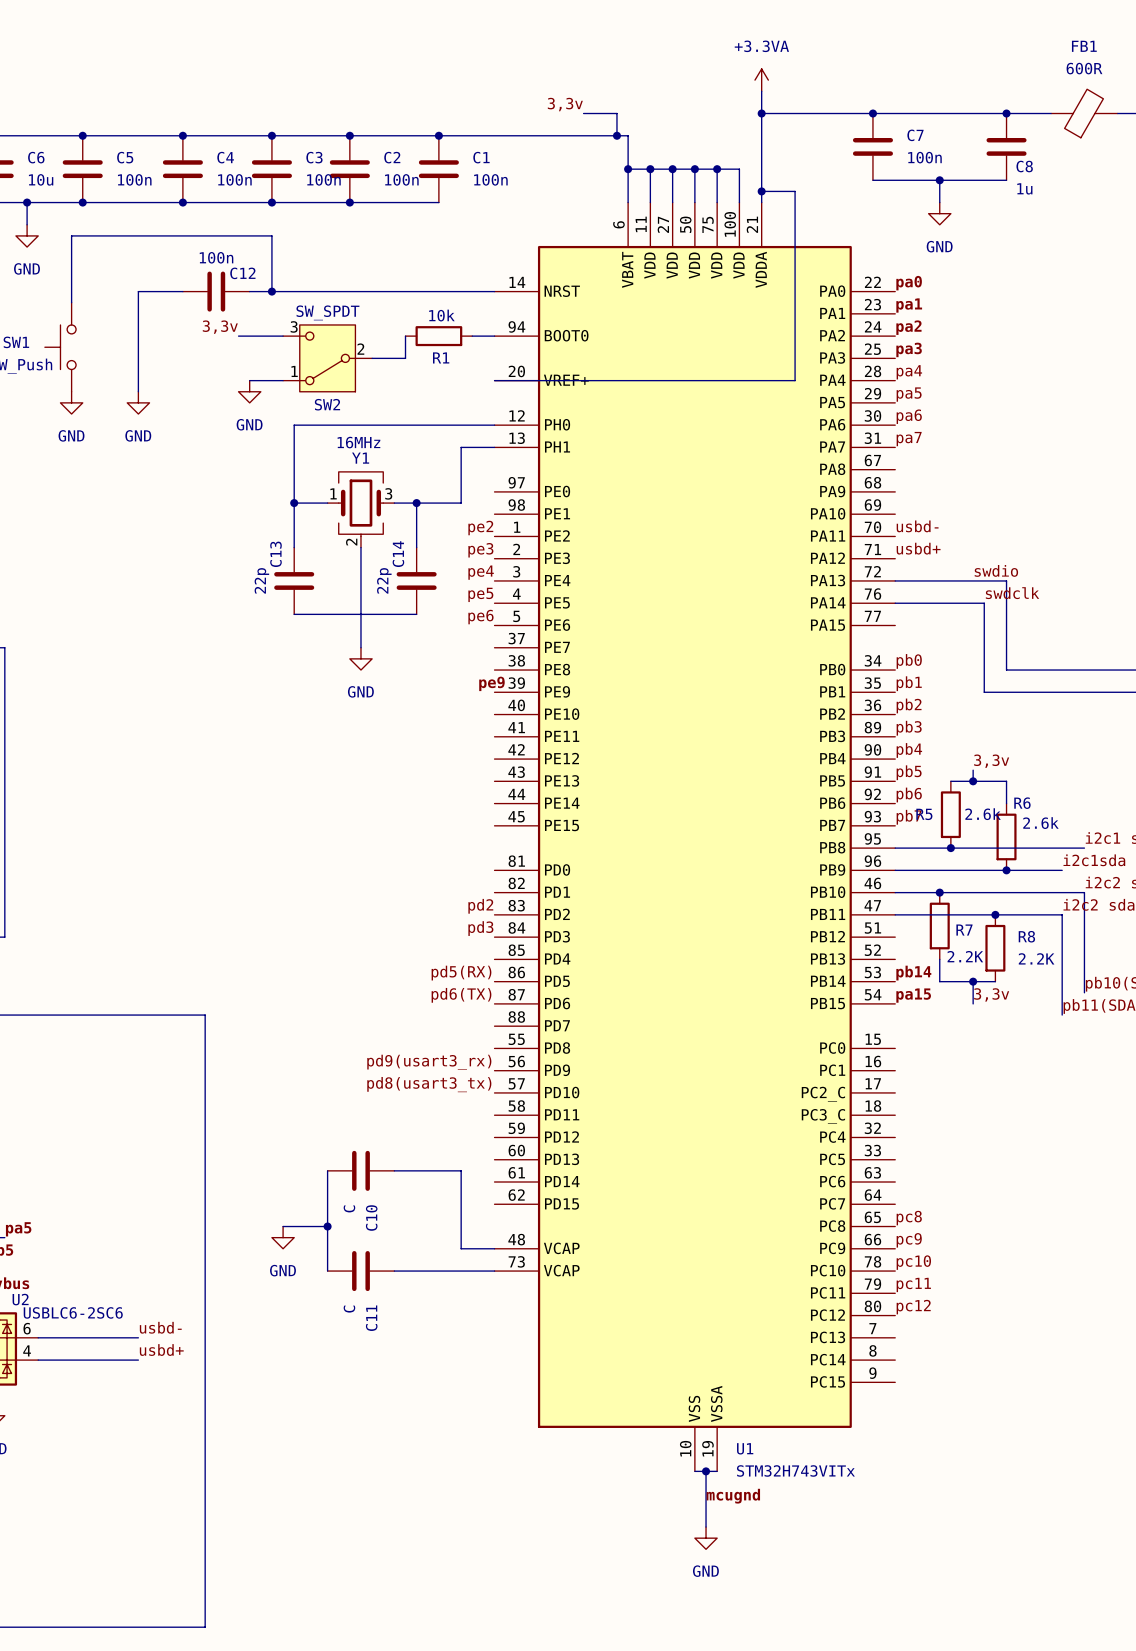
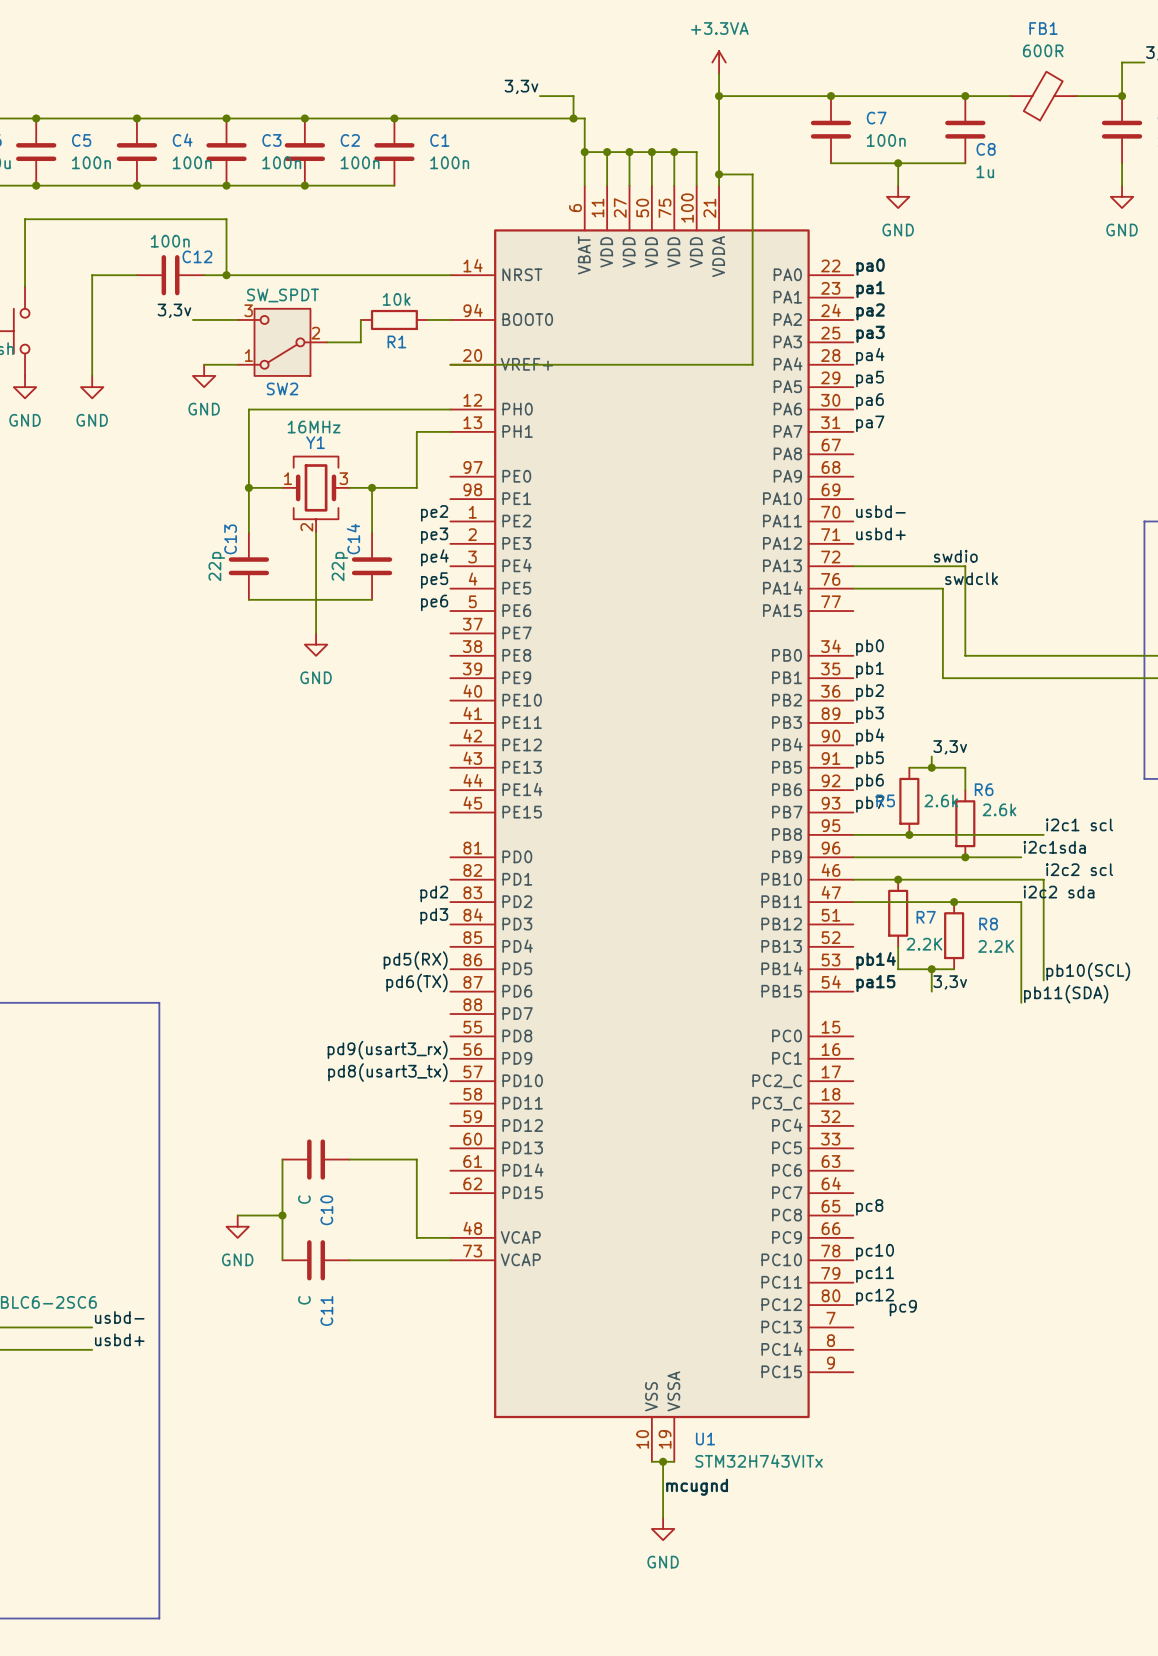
label: pe9 (491, 683) -> none
label position: pc9 (909, 1240) -> pc9 (903, 1308)

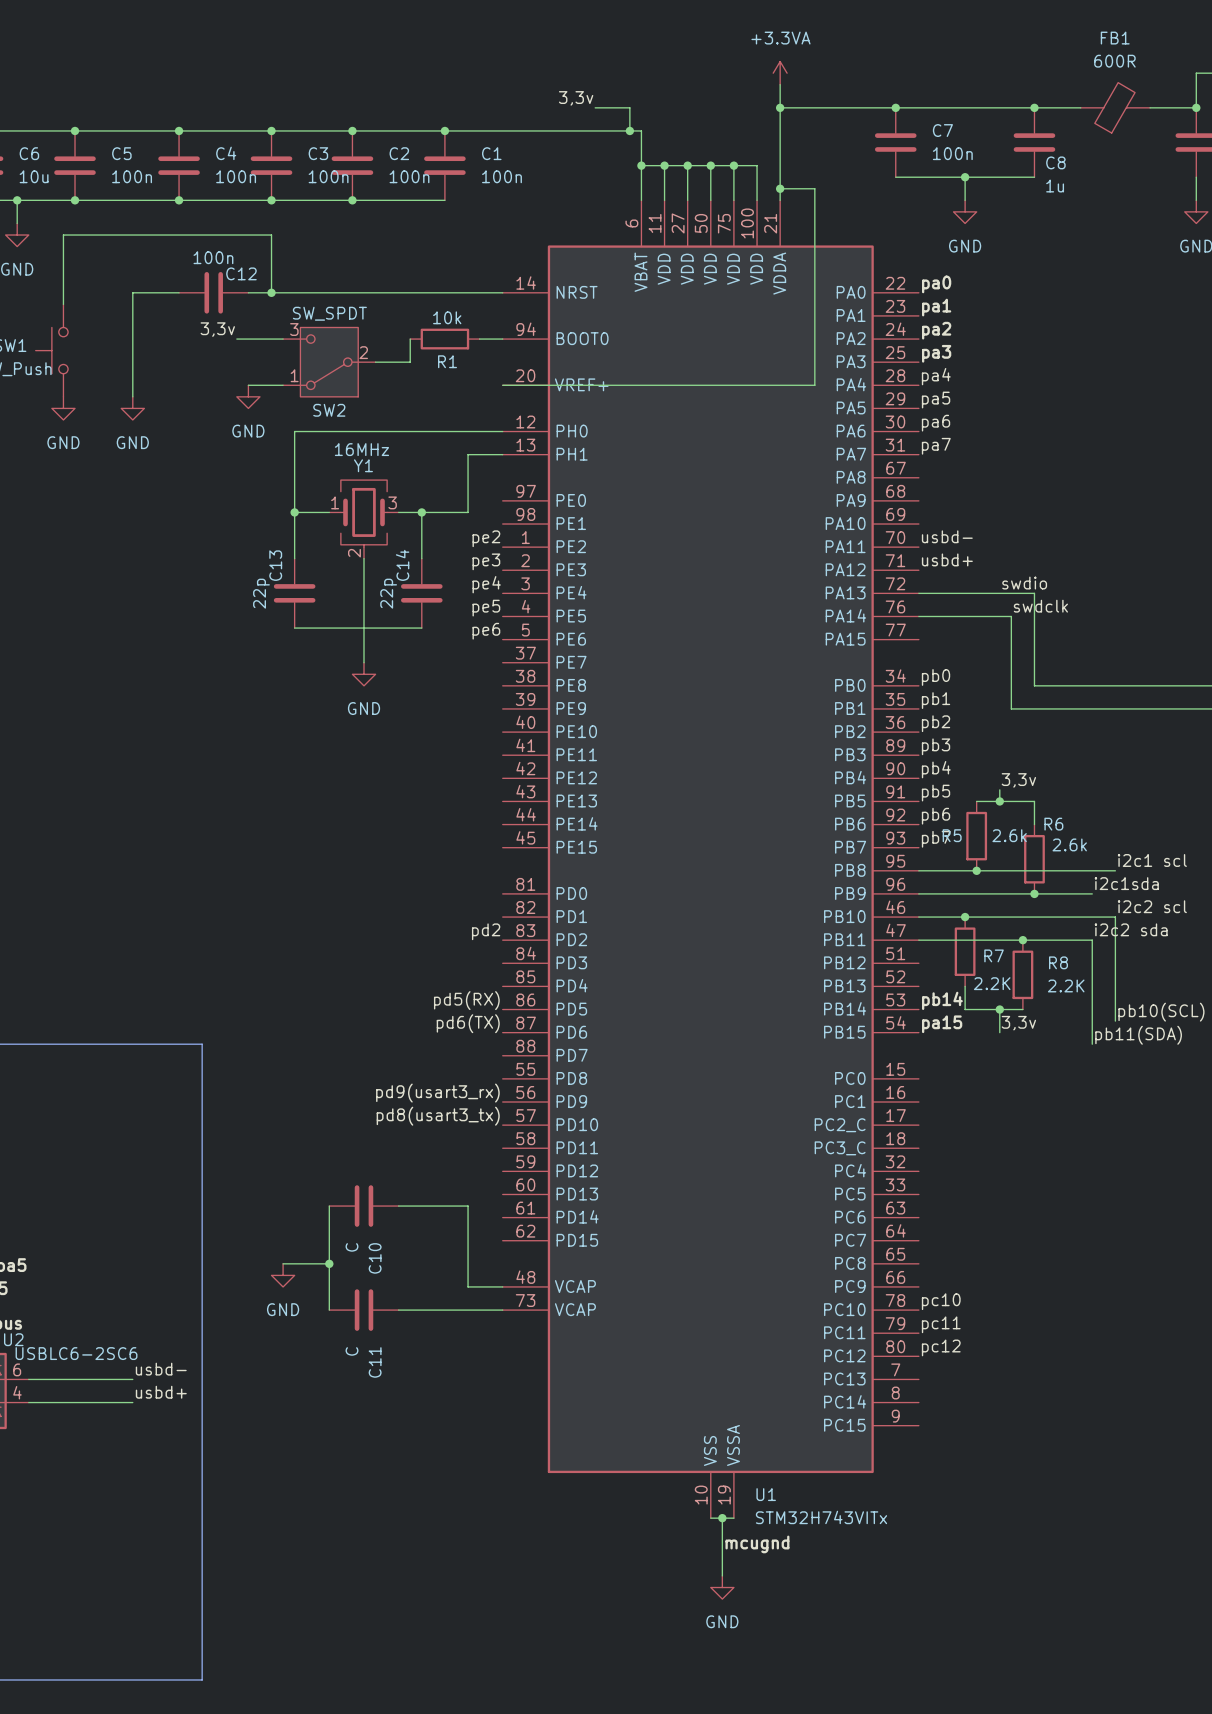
label: pd3 (434, 916) -> none
label: pc8 (869, 1207) -> none
label: pc9 (903, 1308) -> none

